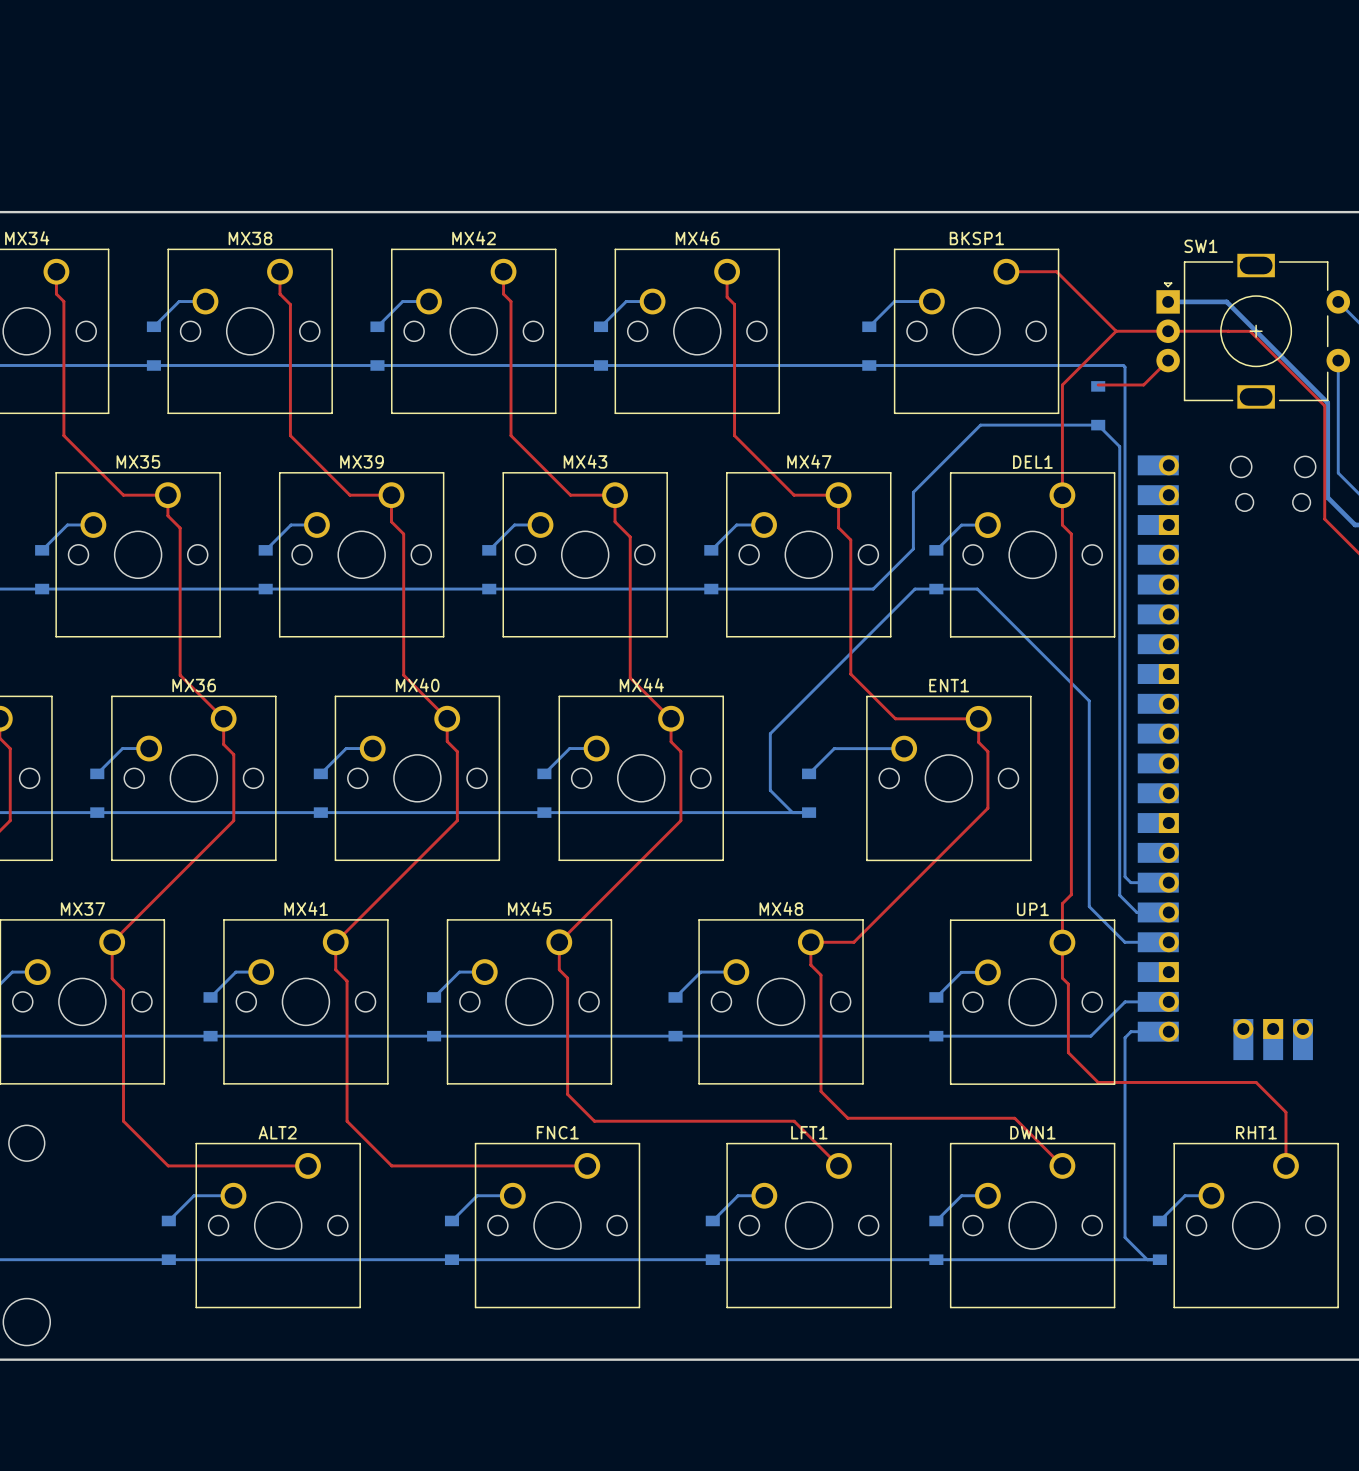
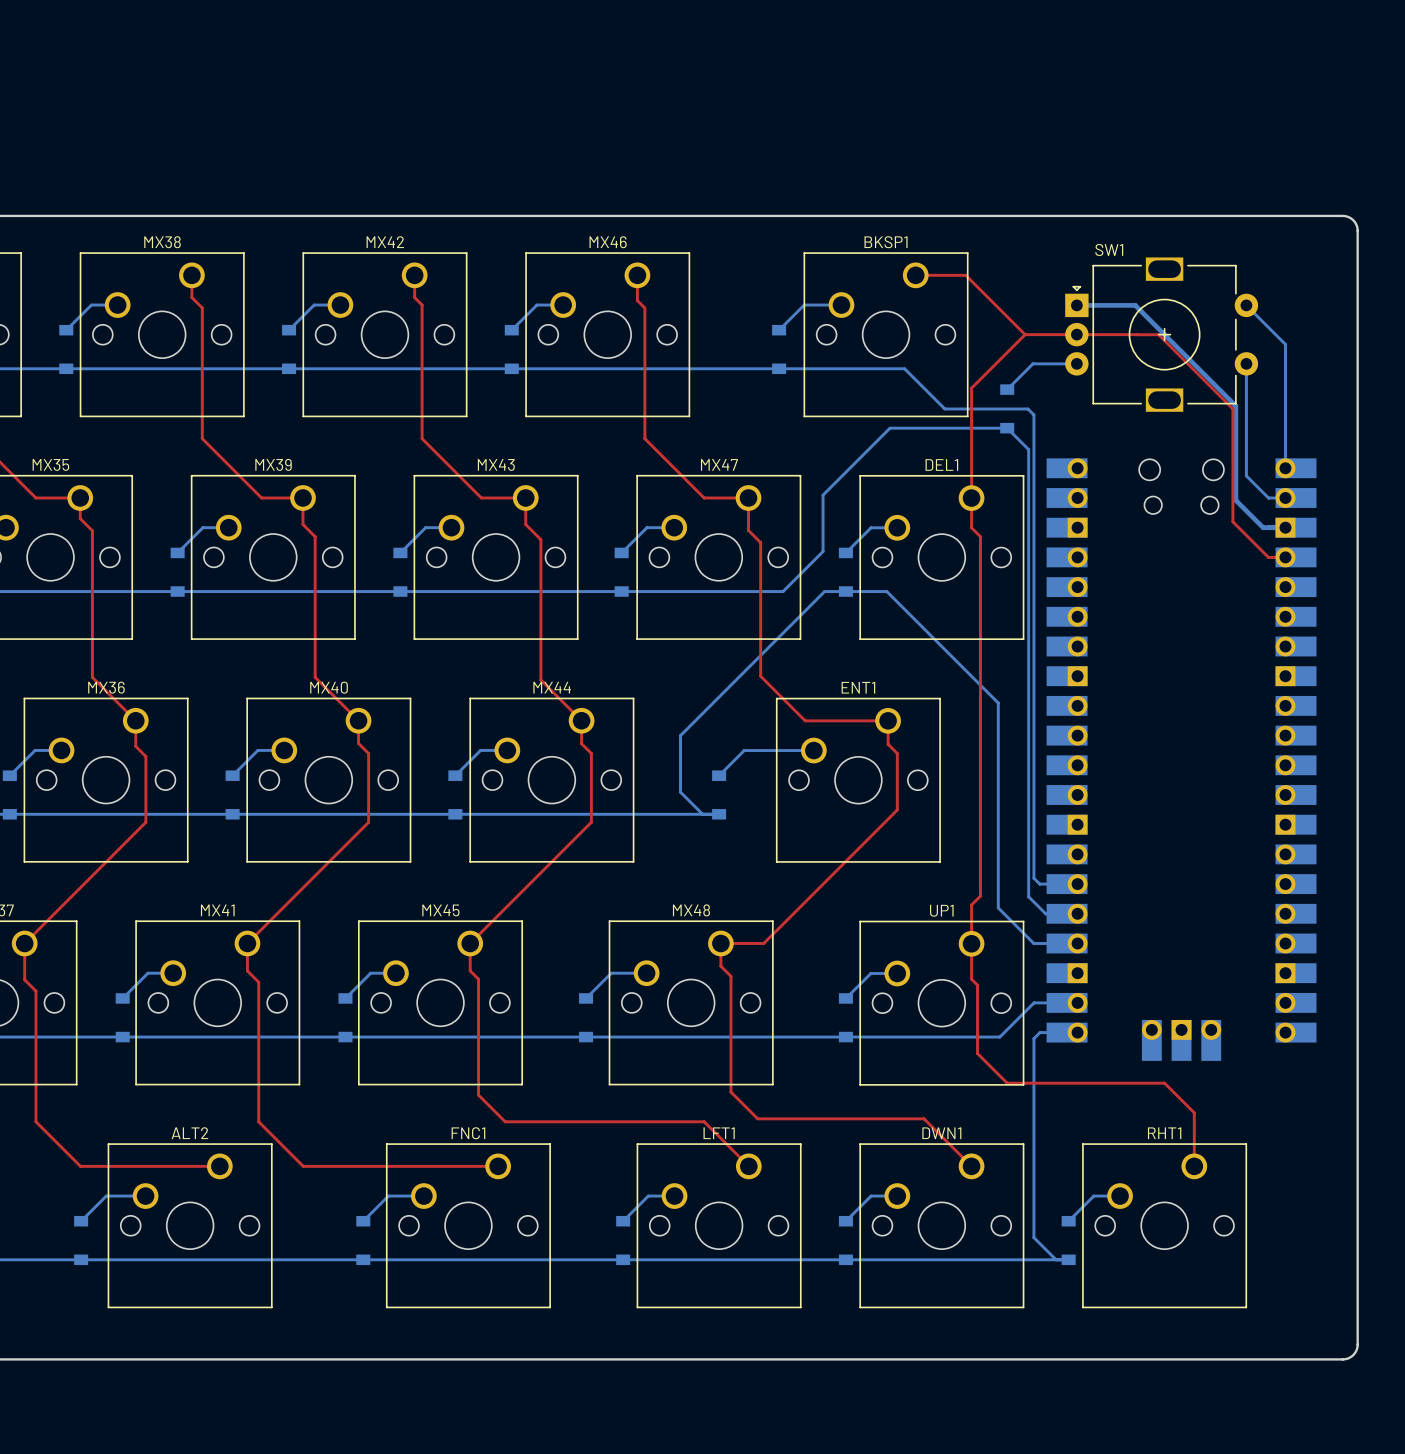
top track: (1168, 360) (1143, 384) (1098, 384) -> none
bottom track: none -> (1076, 363) (1032, 363) (1007, 389)
bottom track: (995, 365) (1123, 365) (1125, 367) (1125, 411) -> (904, 368) (944, 408) (1027, 408) (1033, 414)

